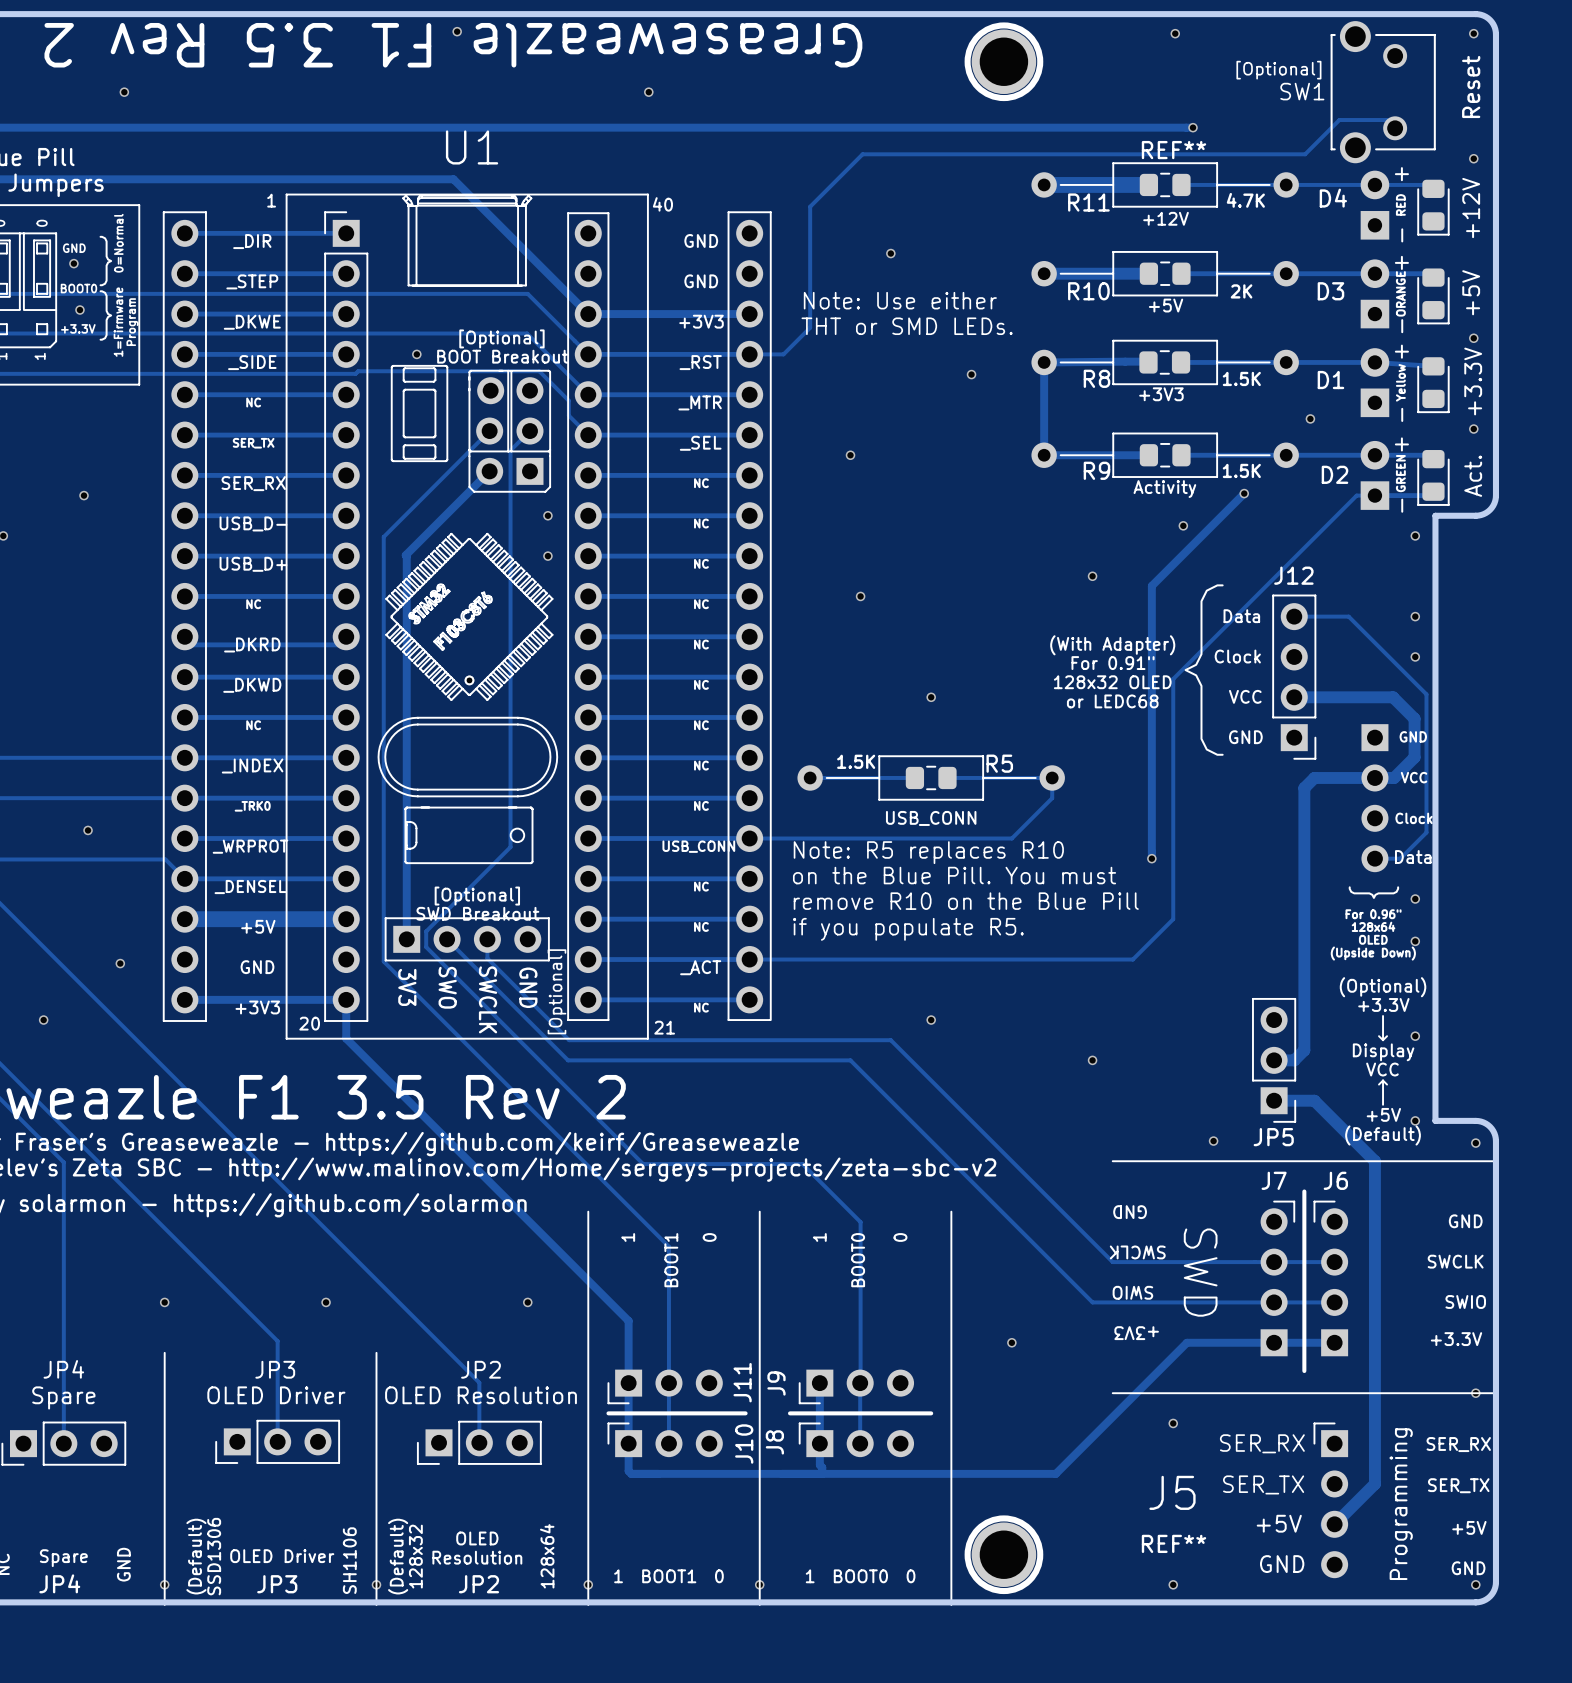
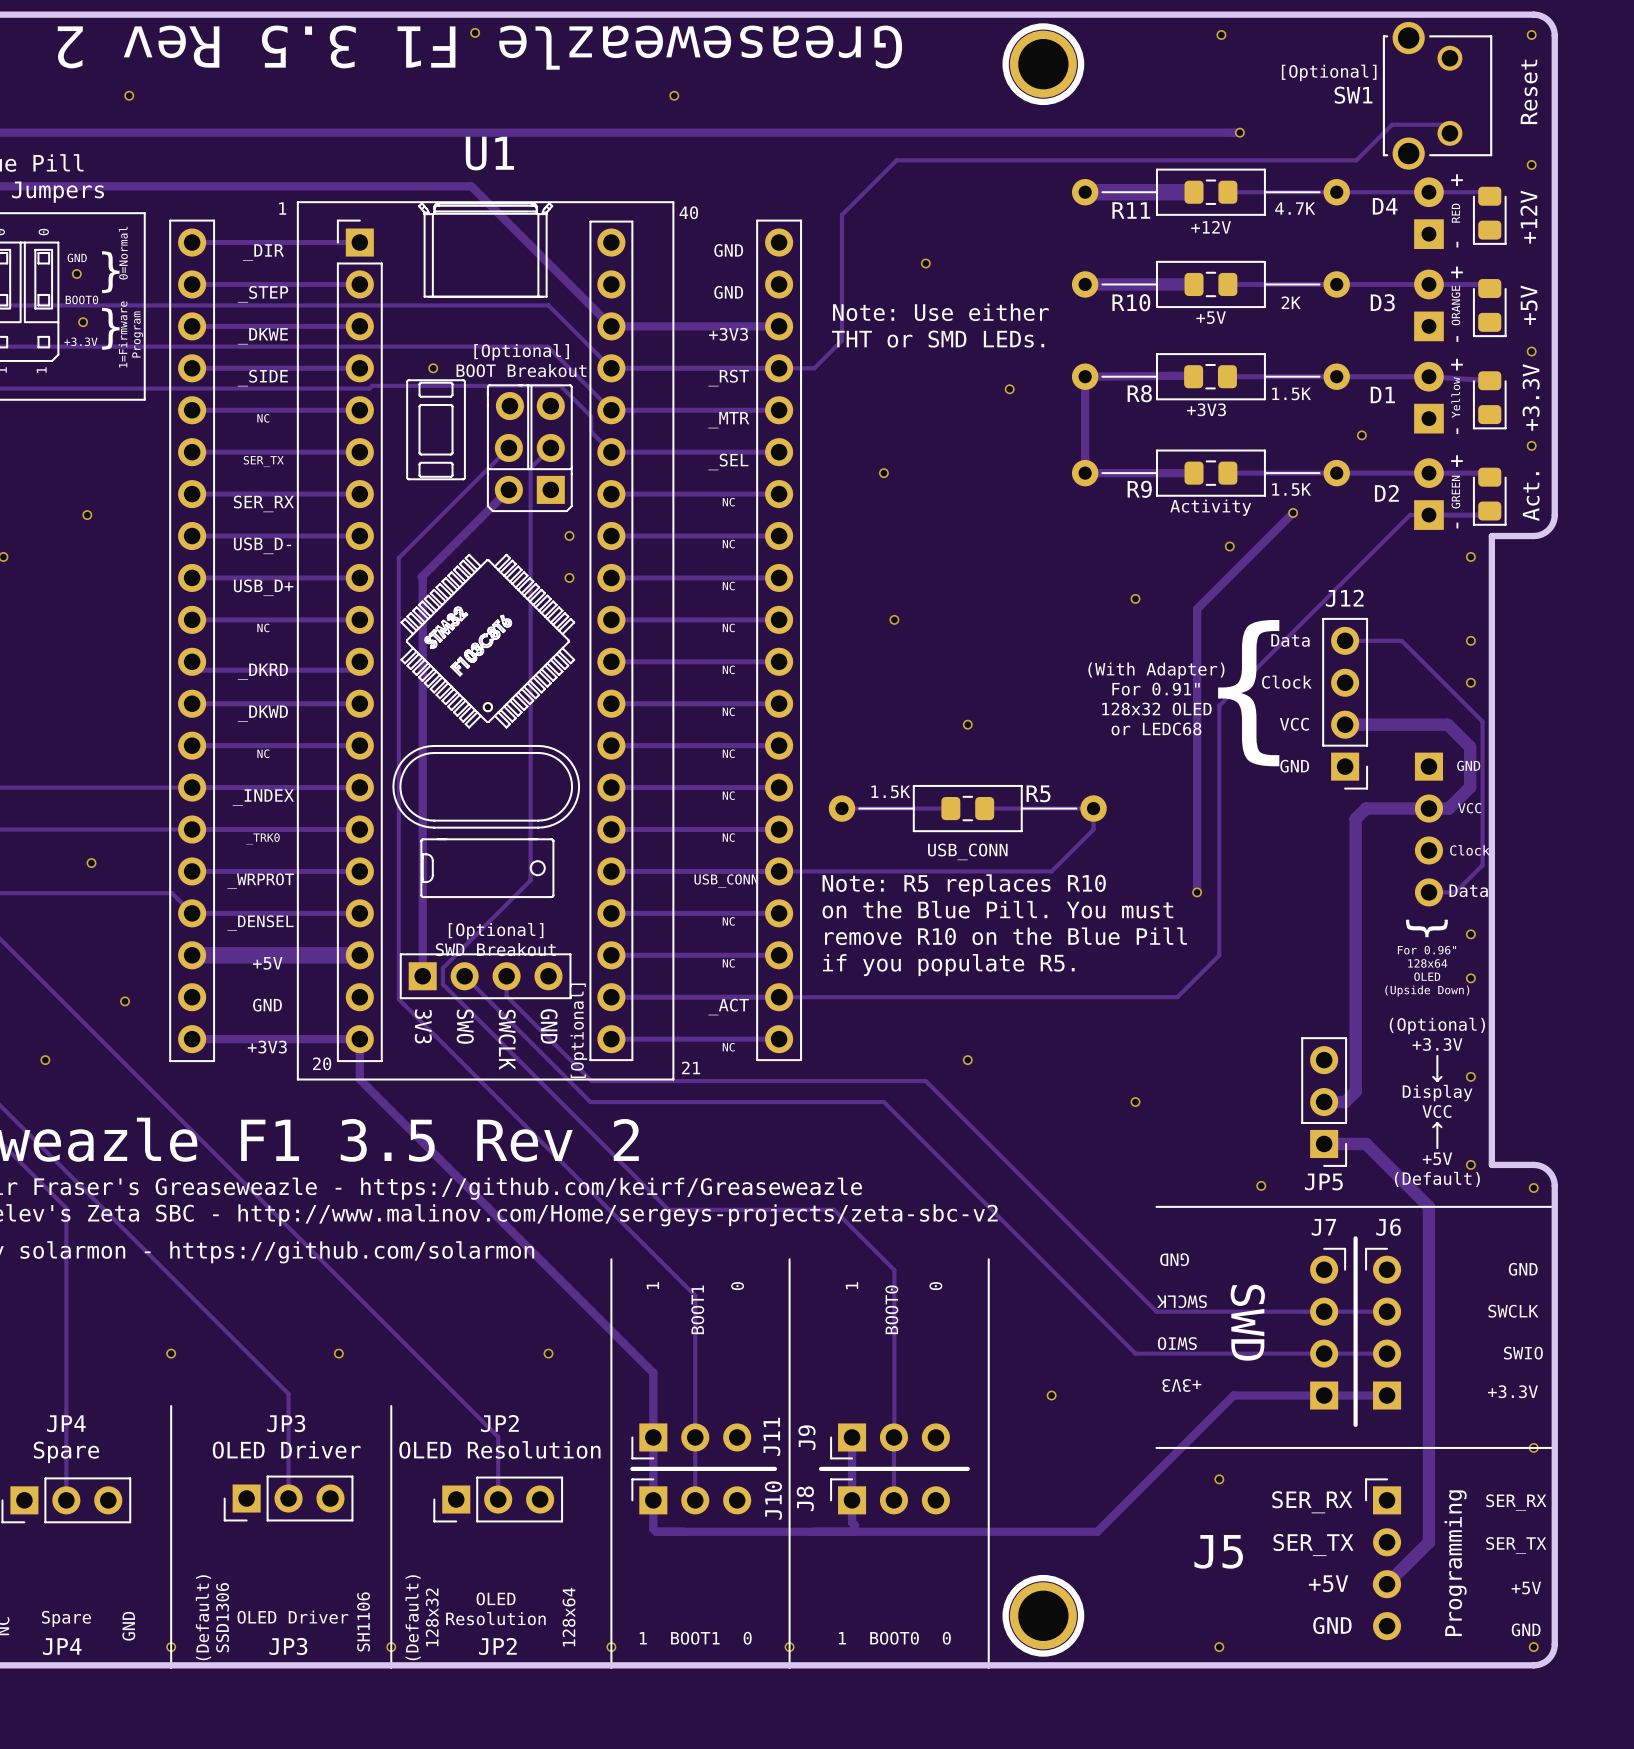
REF**: (1174, 150) -> none
REF**: (1174, 1543) -> none

